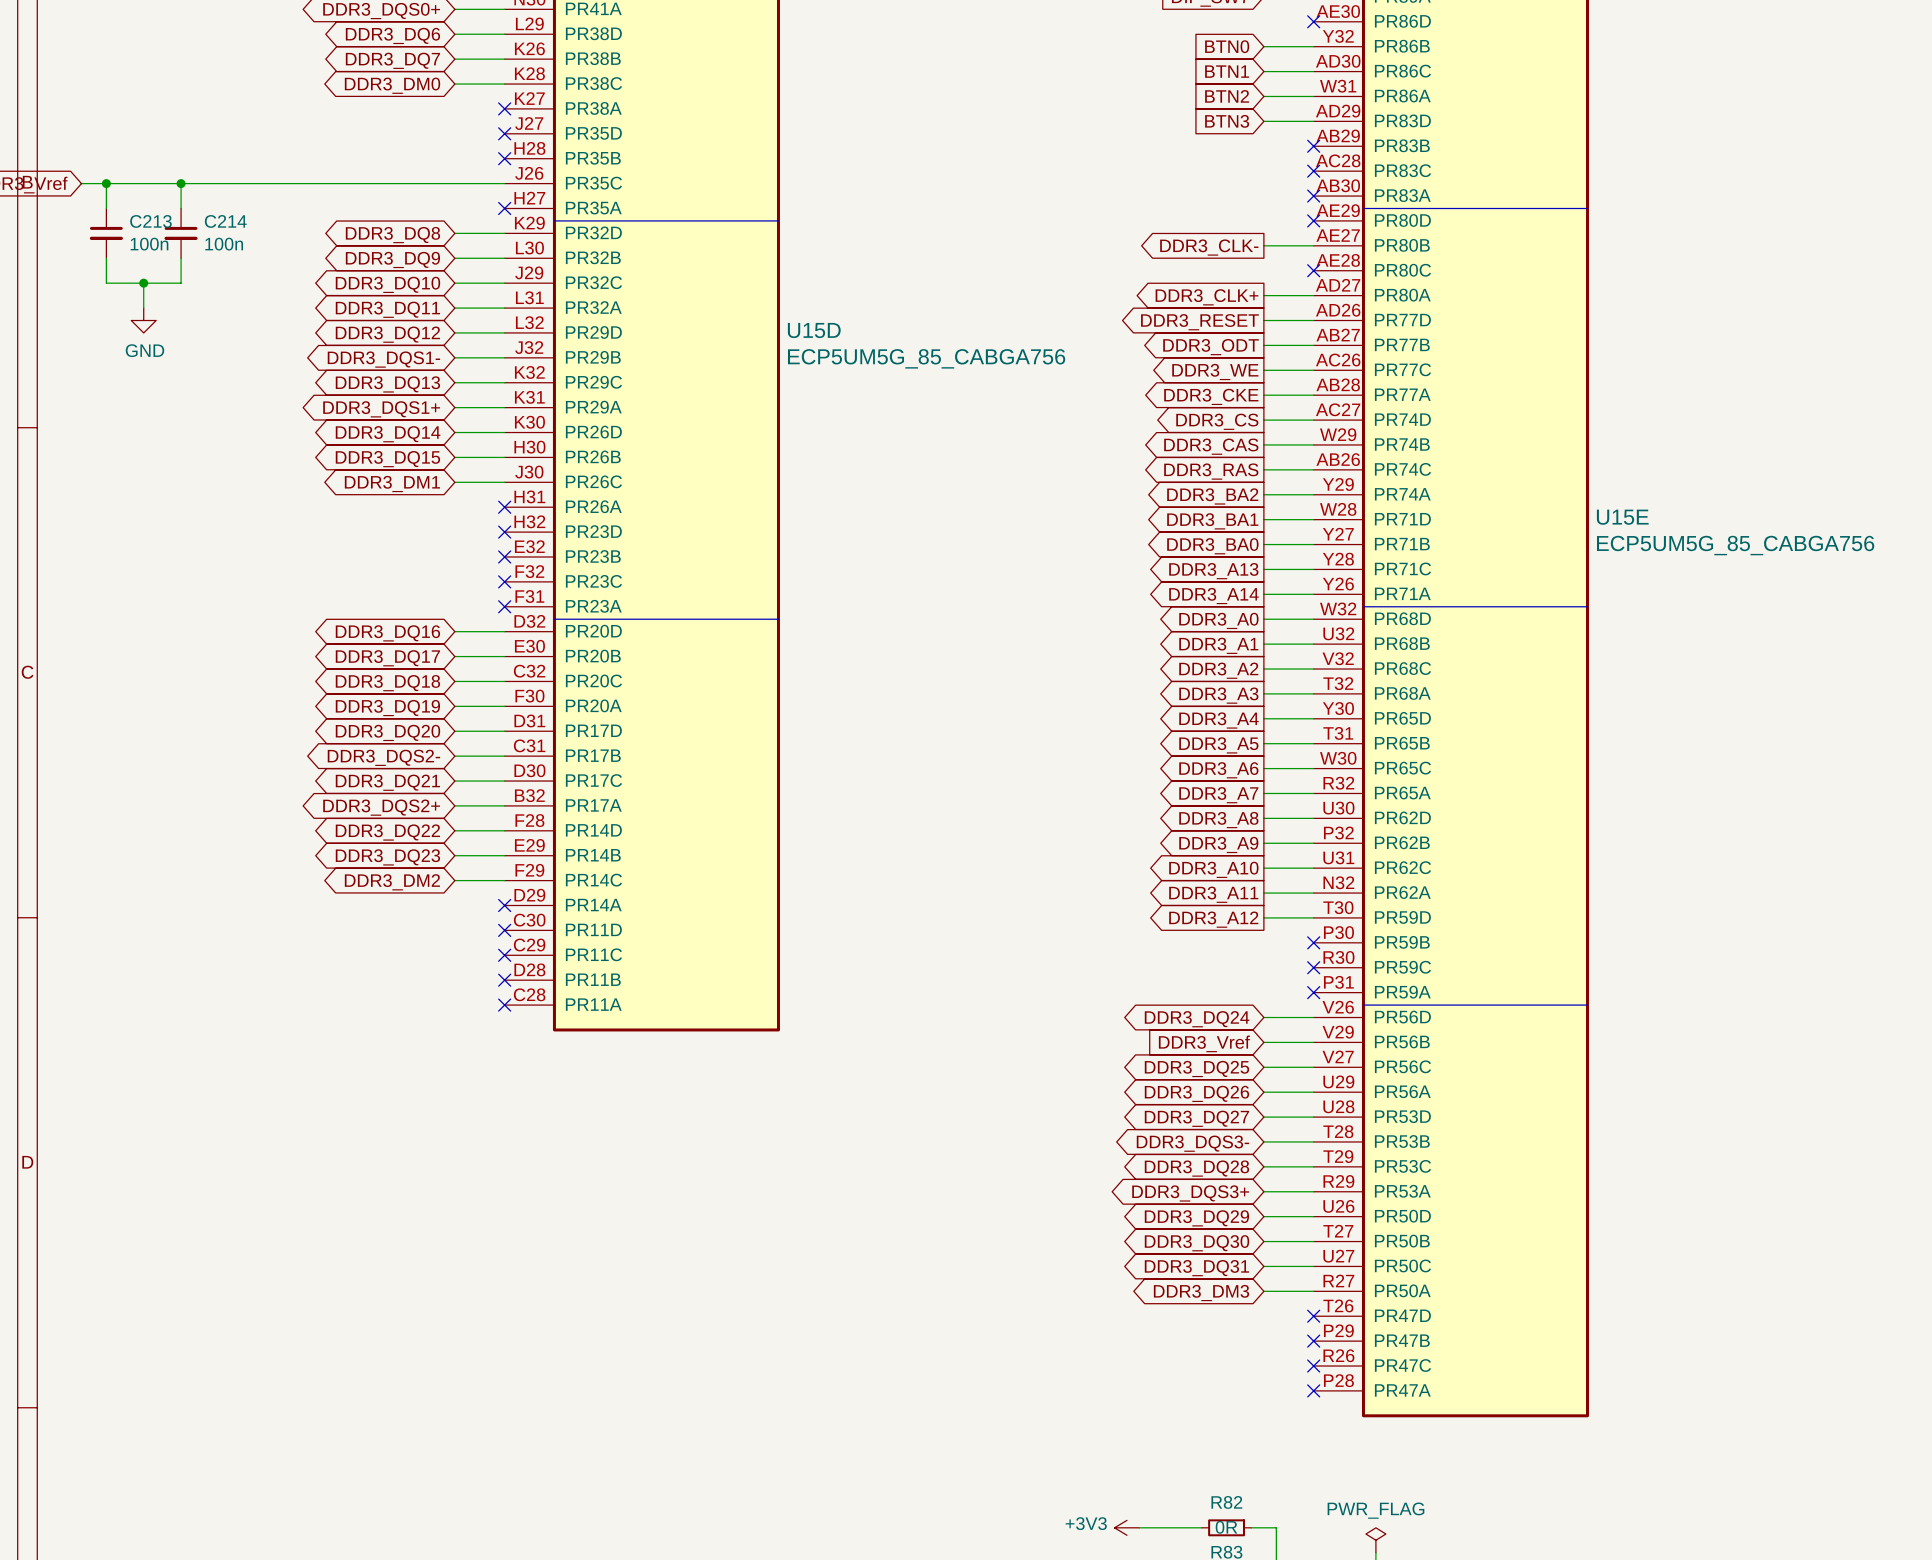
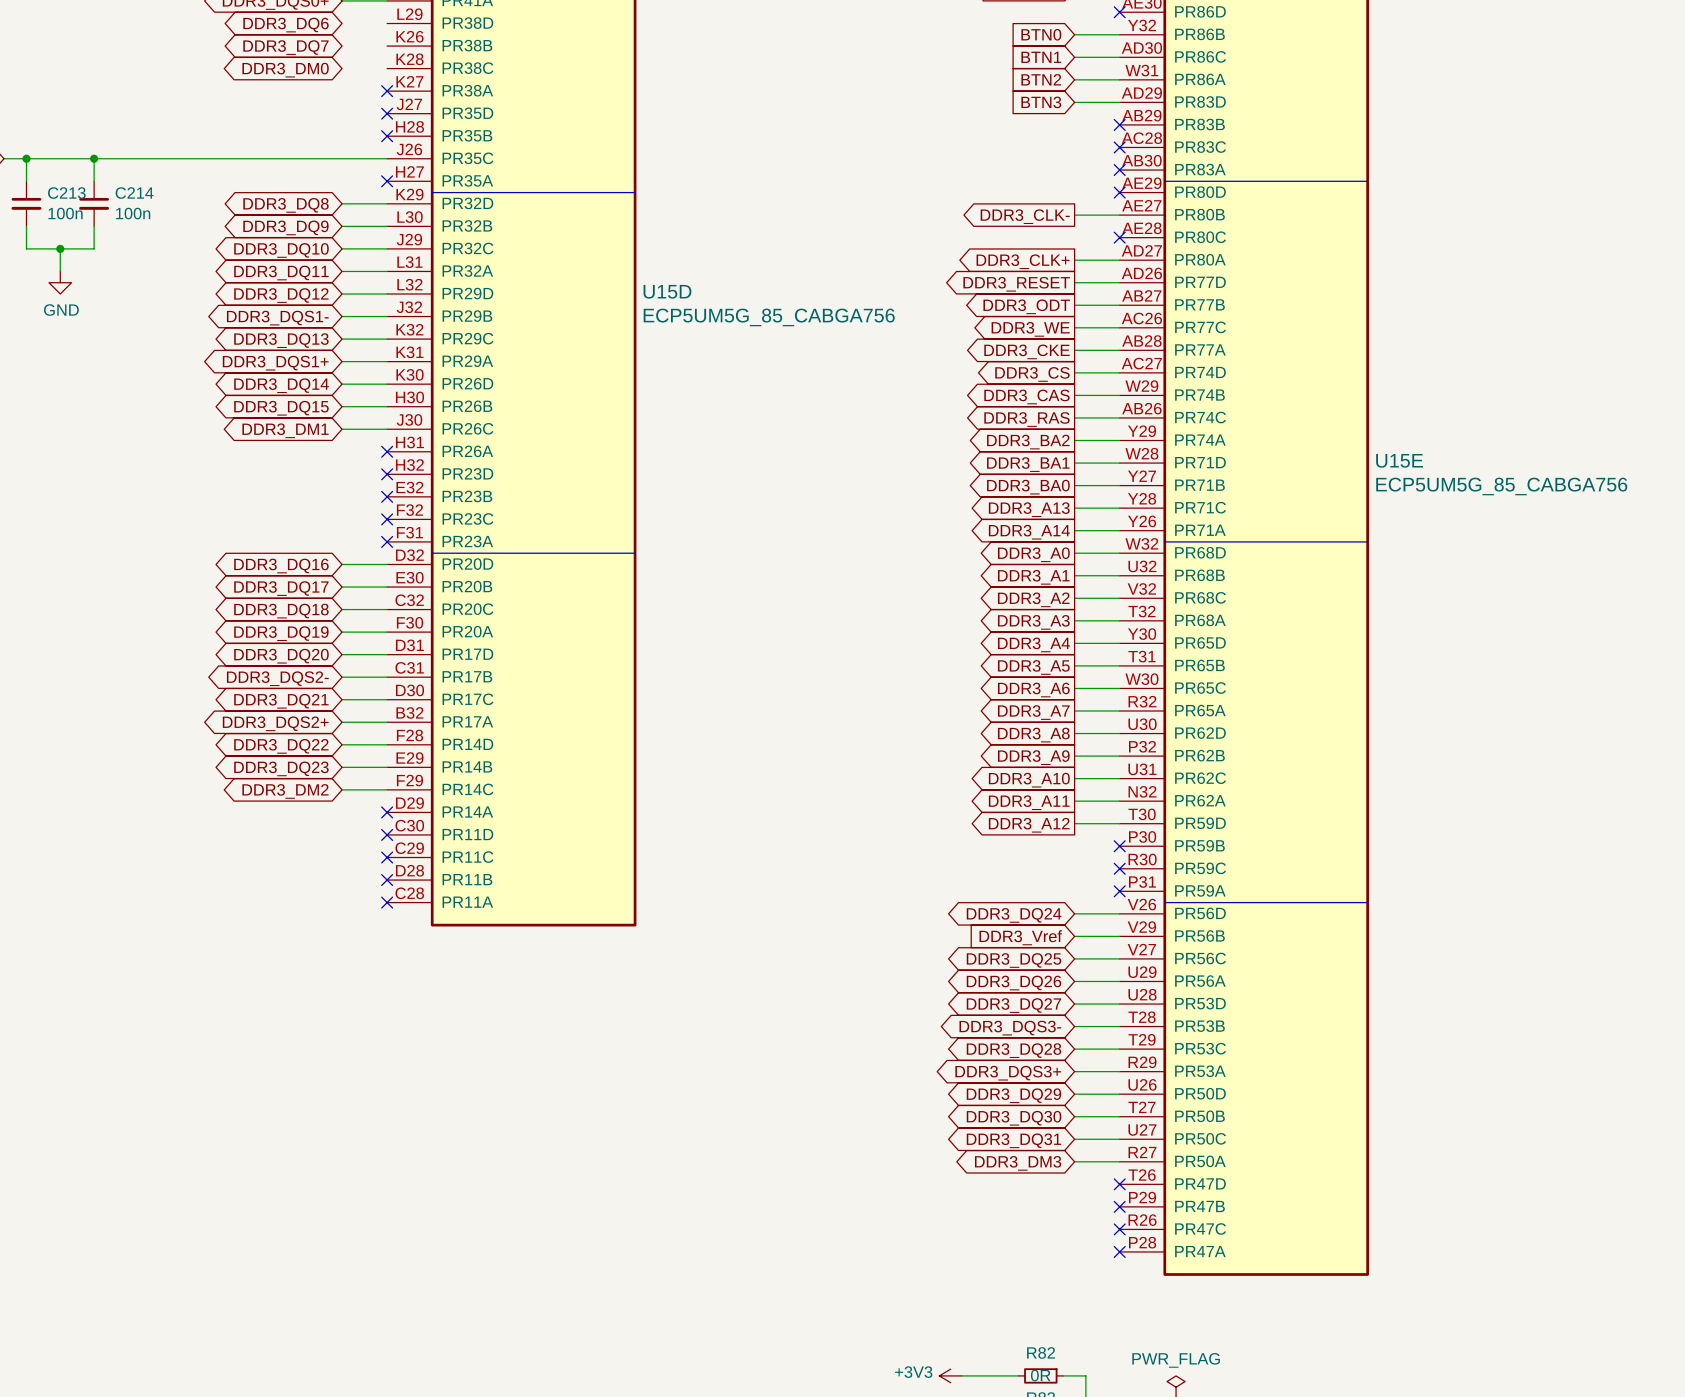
wire: (454, 34) (504, 34) -> none
wire: (454, 59) (504, 59) -> none
wire: (454, 84) (504, 84) -> none

